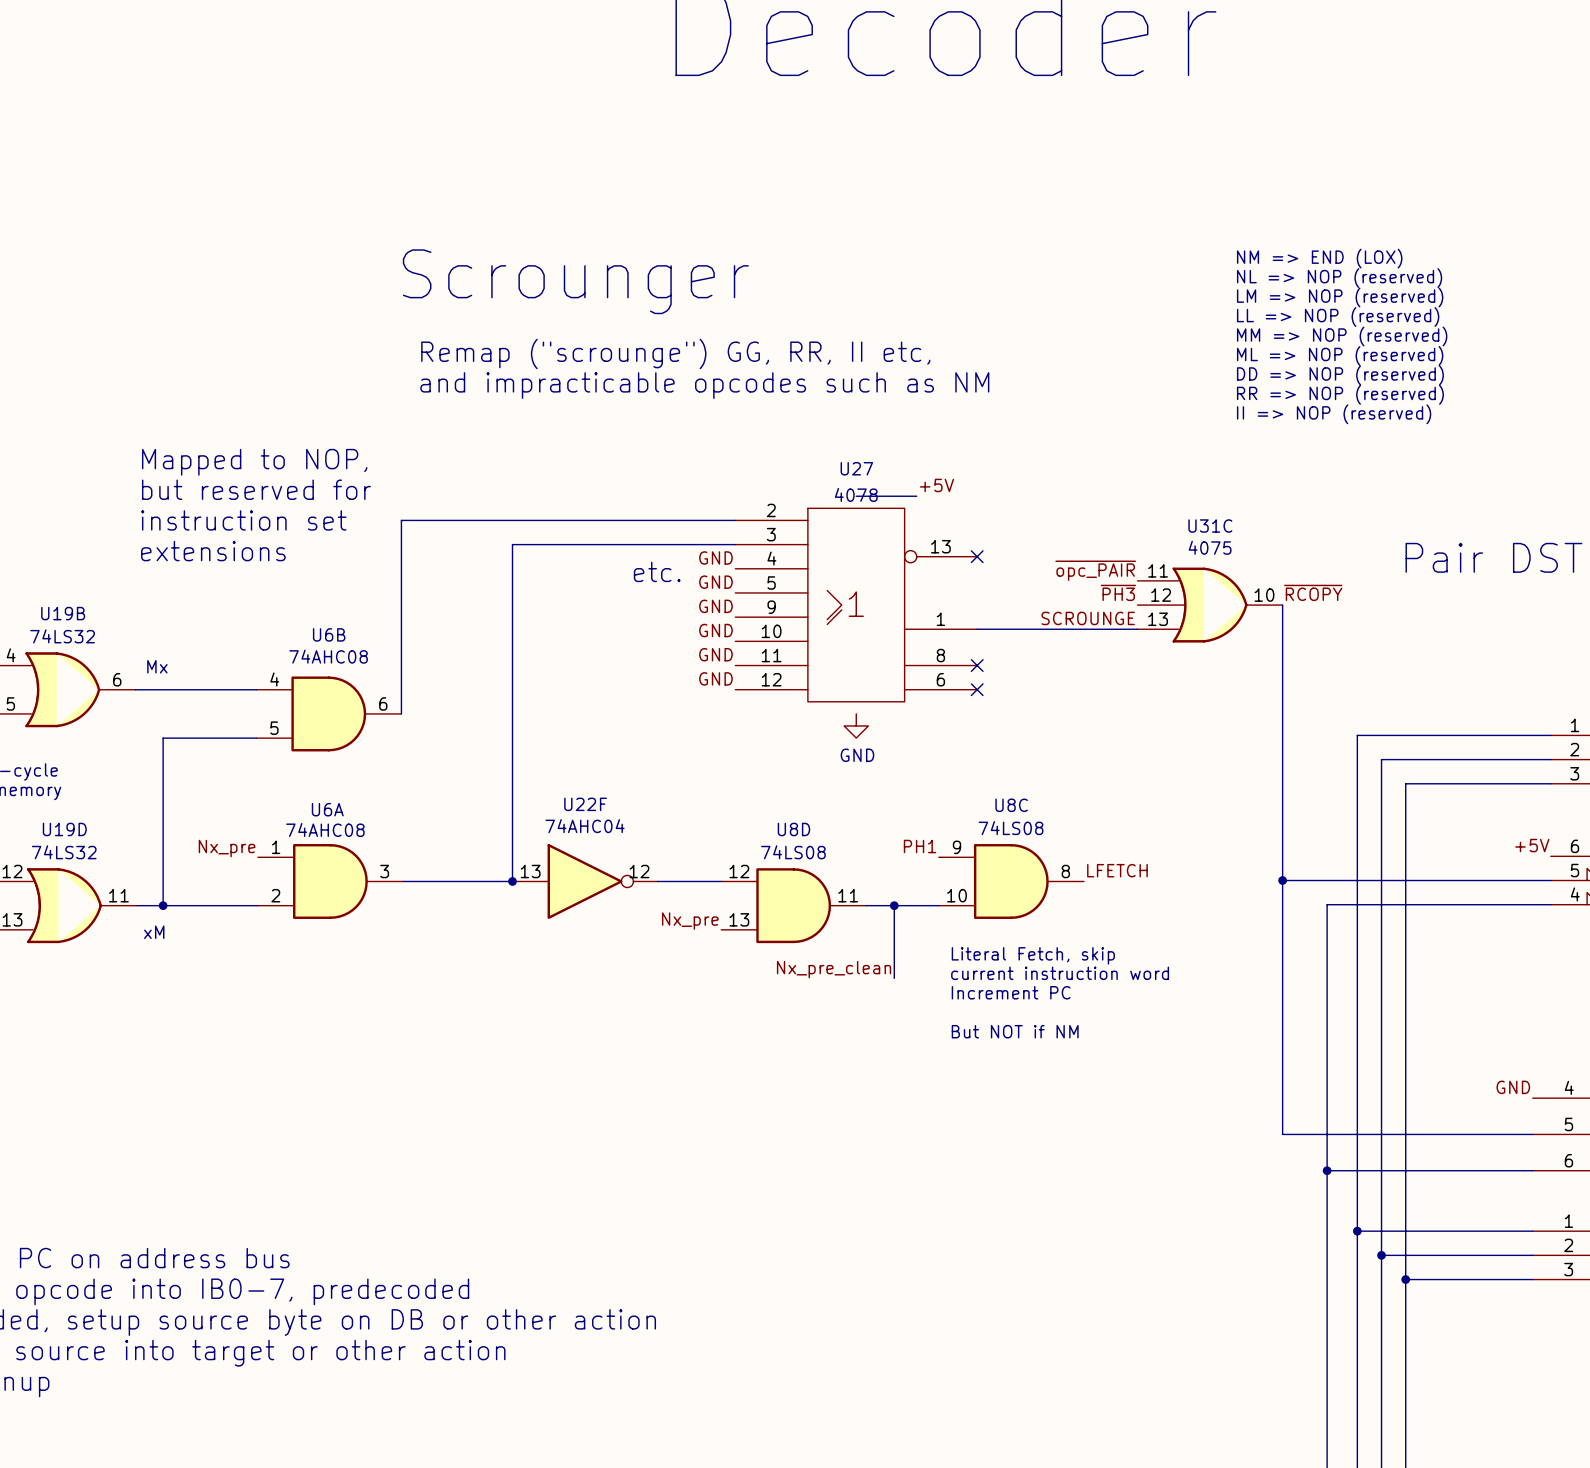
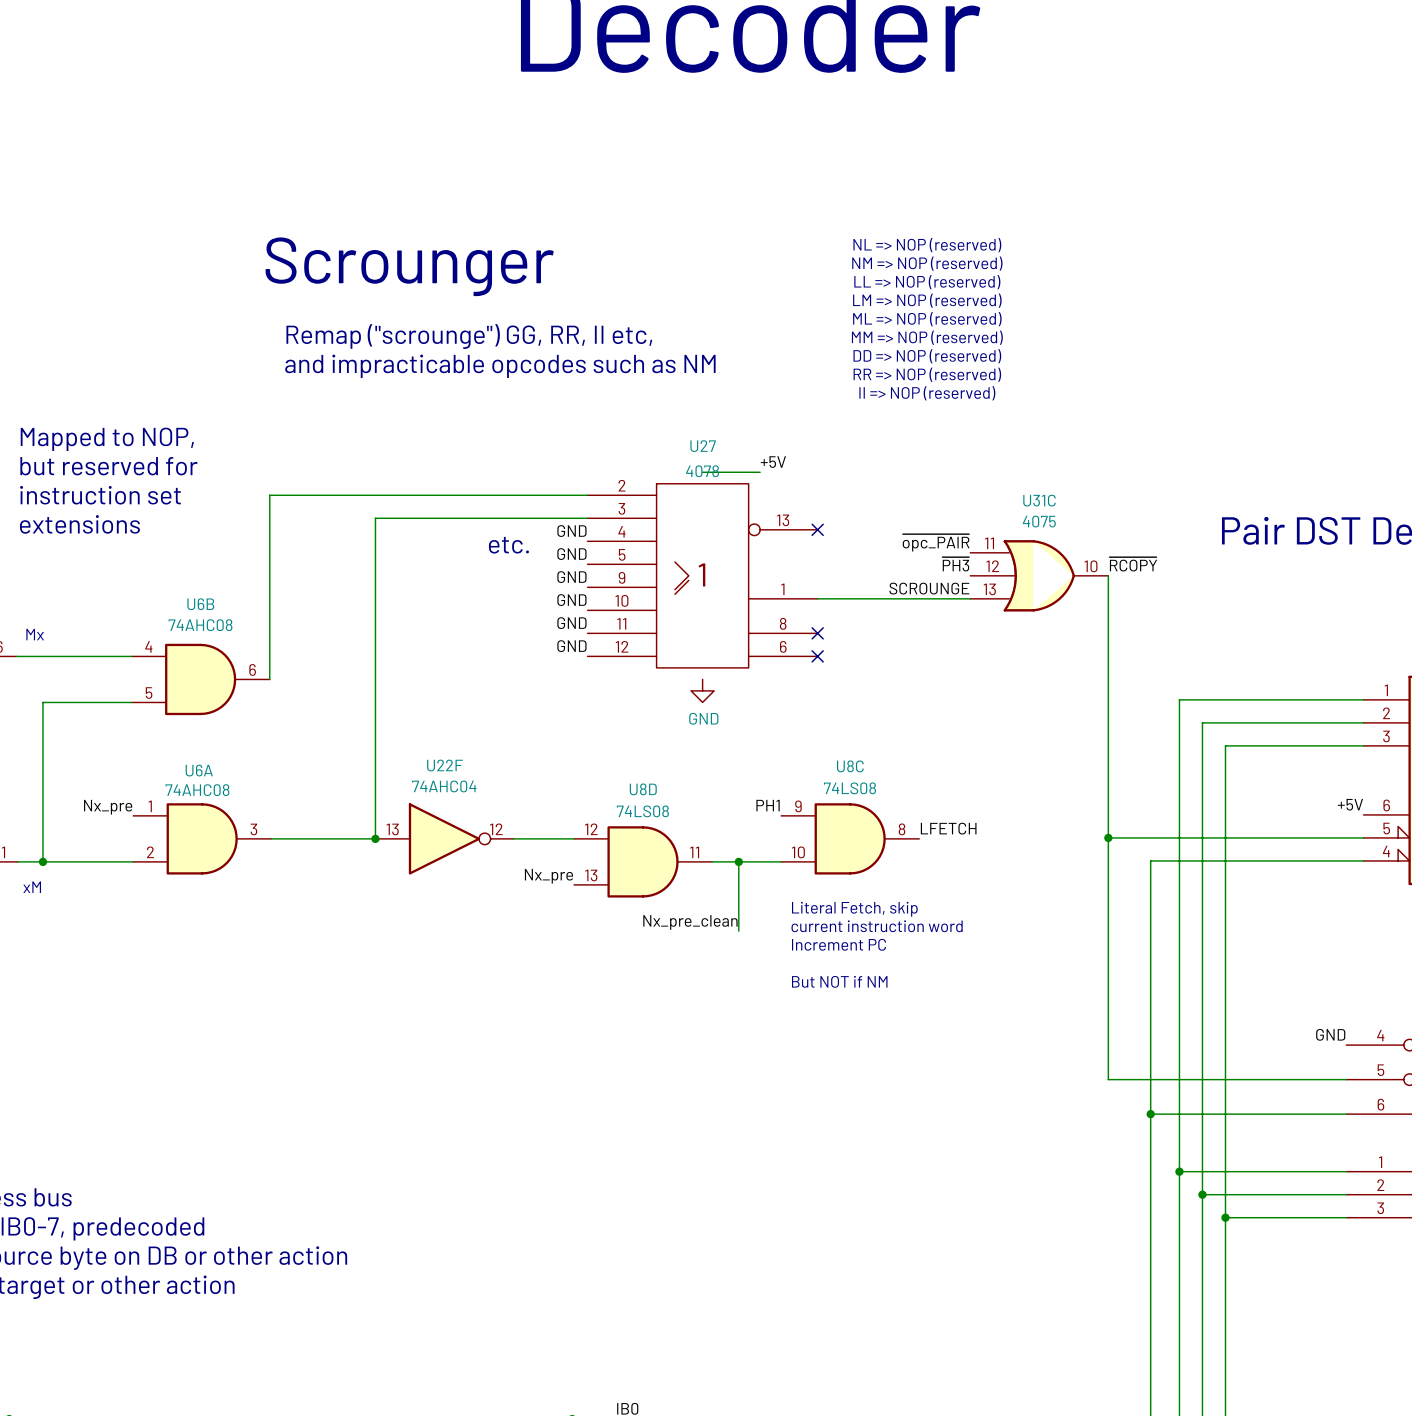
text: NM => END (LOX) (1319, 258) -> NL => NOP (reserved) (927, 245)
text: NL => NOP (reserved) (1339, 278) -> NM => NOP (reserved) (927, 263)
text: LM => NOP (reserved) (1340, 297) -> LL => NOP (reserved) (927, 282)
text: LL => NOP (reserved) (1338, 317) -> LM => NOP (reserved) (927, 300)
text: MM => NOP (reserved) (1342, 336) -> ML => NOP (reserved) (927, 319)
text: ML => NOP (reserved) (1340, 355) -> MM => NOP (reserved) (927, 337)
text position: DD => NOP (reserved) (1340, 375) -> DD => NOP (reserved) (927, 356)
text position: RR => NOP (reserved) (1340, 394) -> RR => NOP (reserved) (927, 374)
text position: II => NOP (reserved) (1334, 414) -> II => NOP (reserved) (927, 393)

